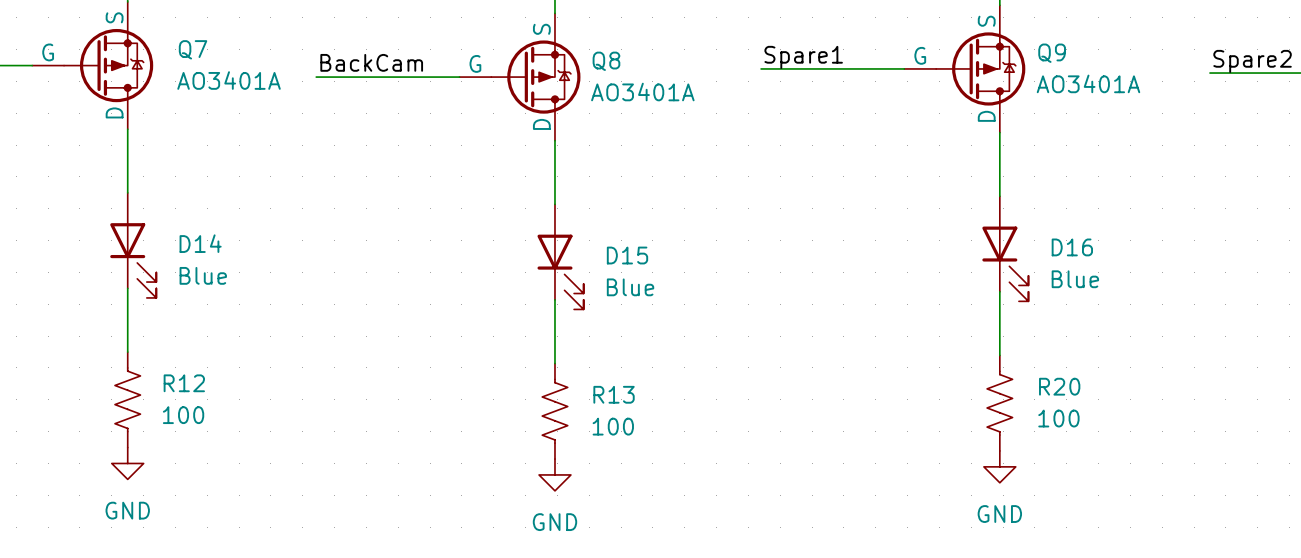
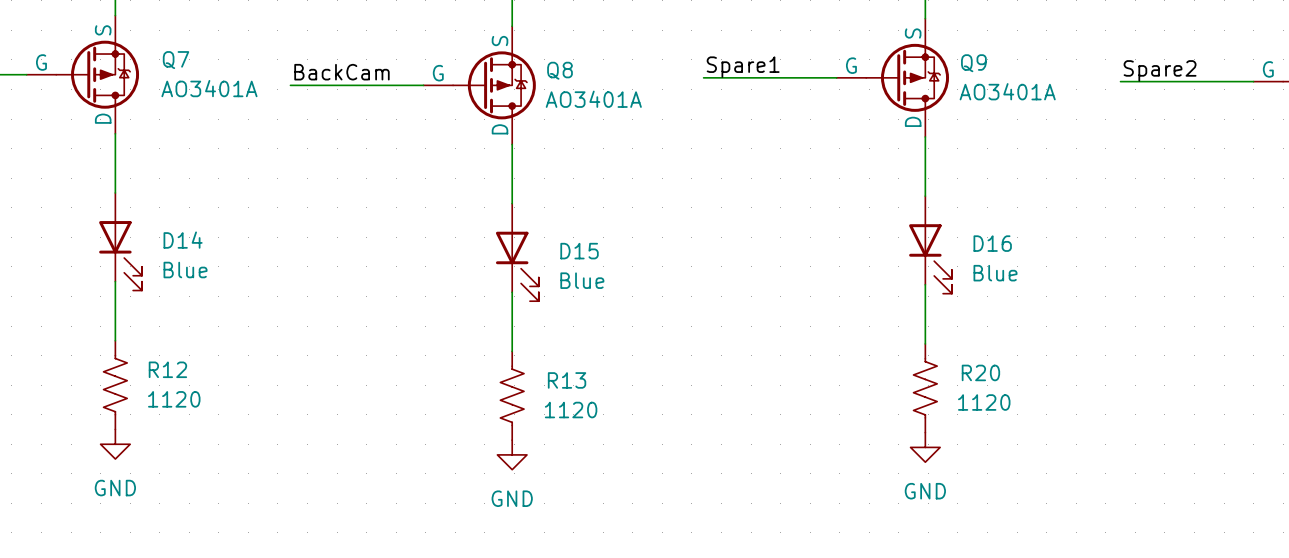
R12 value: 100 (183, 415) -> 1120 (174, 399)
R20 value: 100 (1058, 418) -> 1120 (984, 402)
R13 value: 100 (613, 426) -> 1120 (571, 410)

